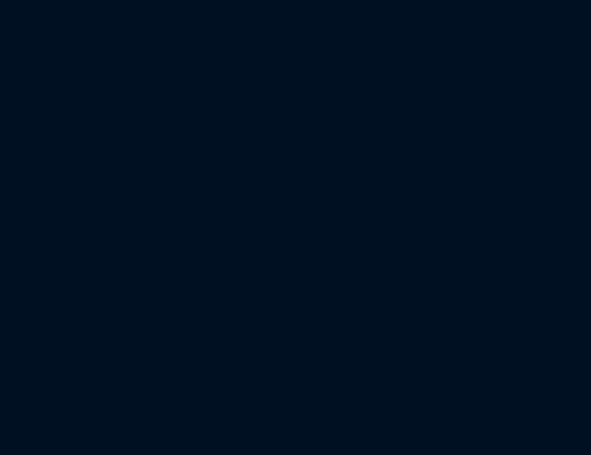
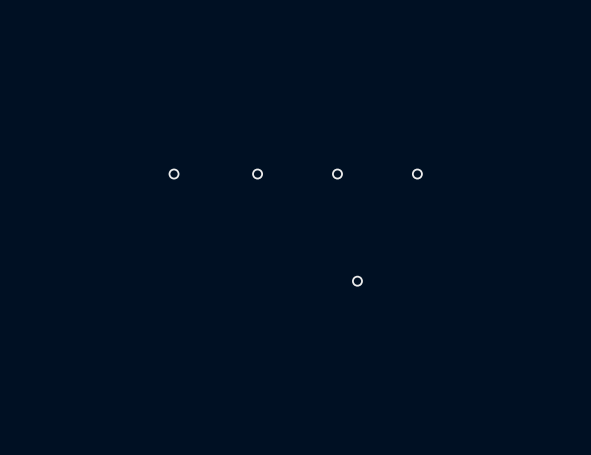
via: none -> (174, 174)
via: none -> (257, 174)
via: none -> (337, 174)
via: none -> (417, 174)
via: none -> (357, 281)

